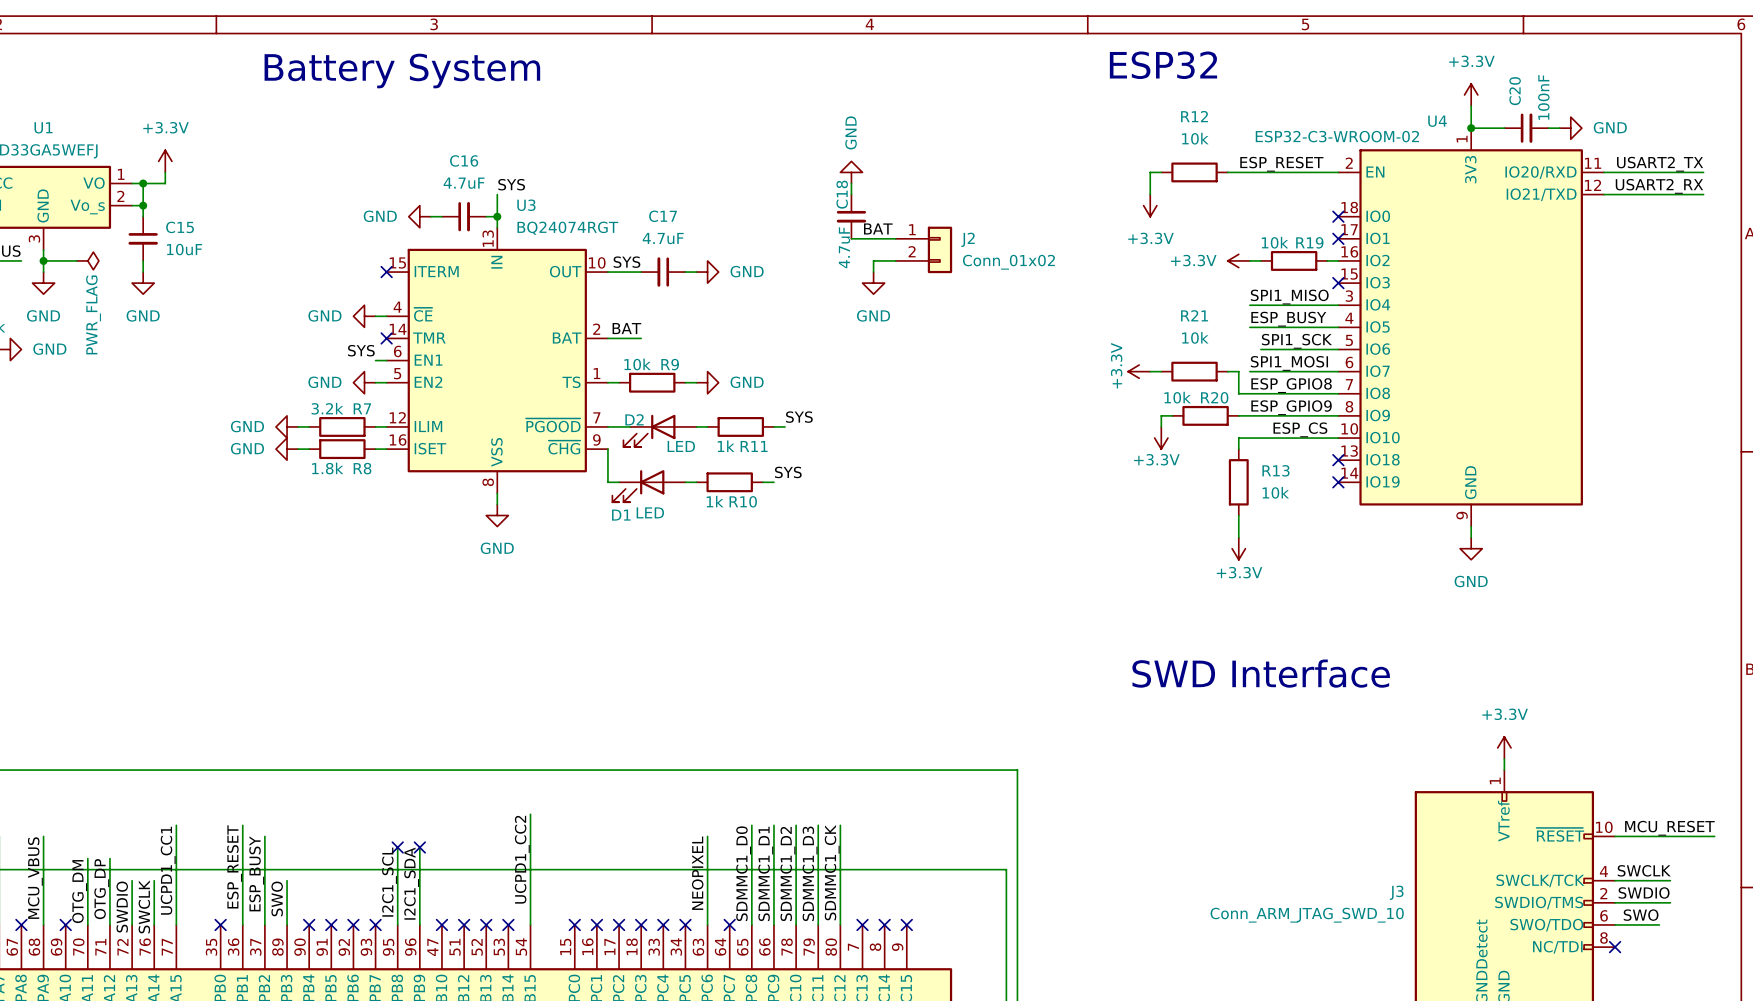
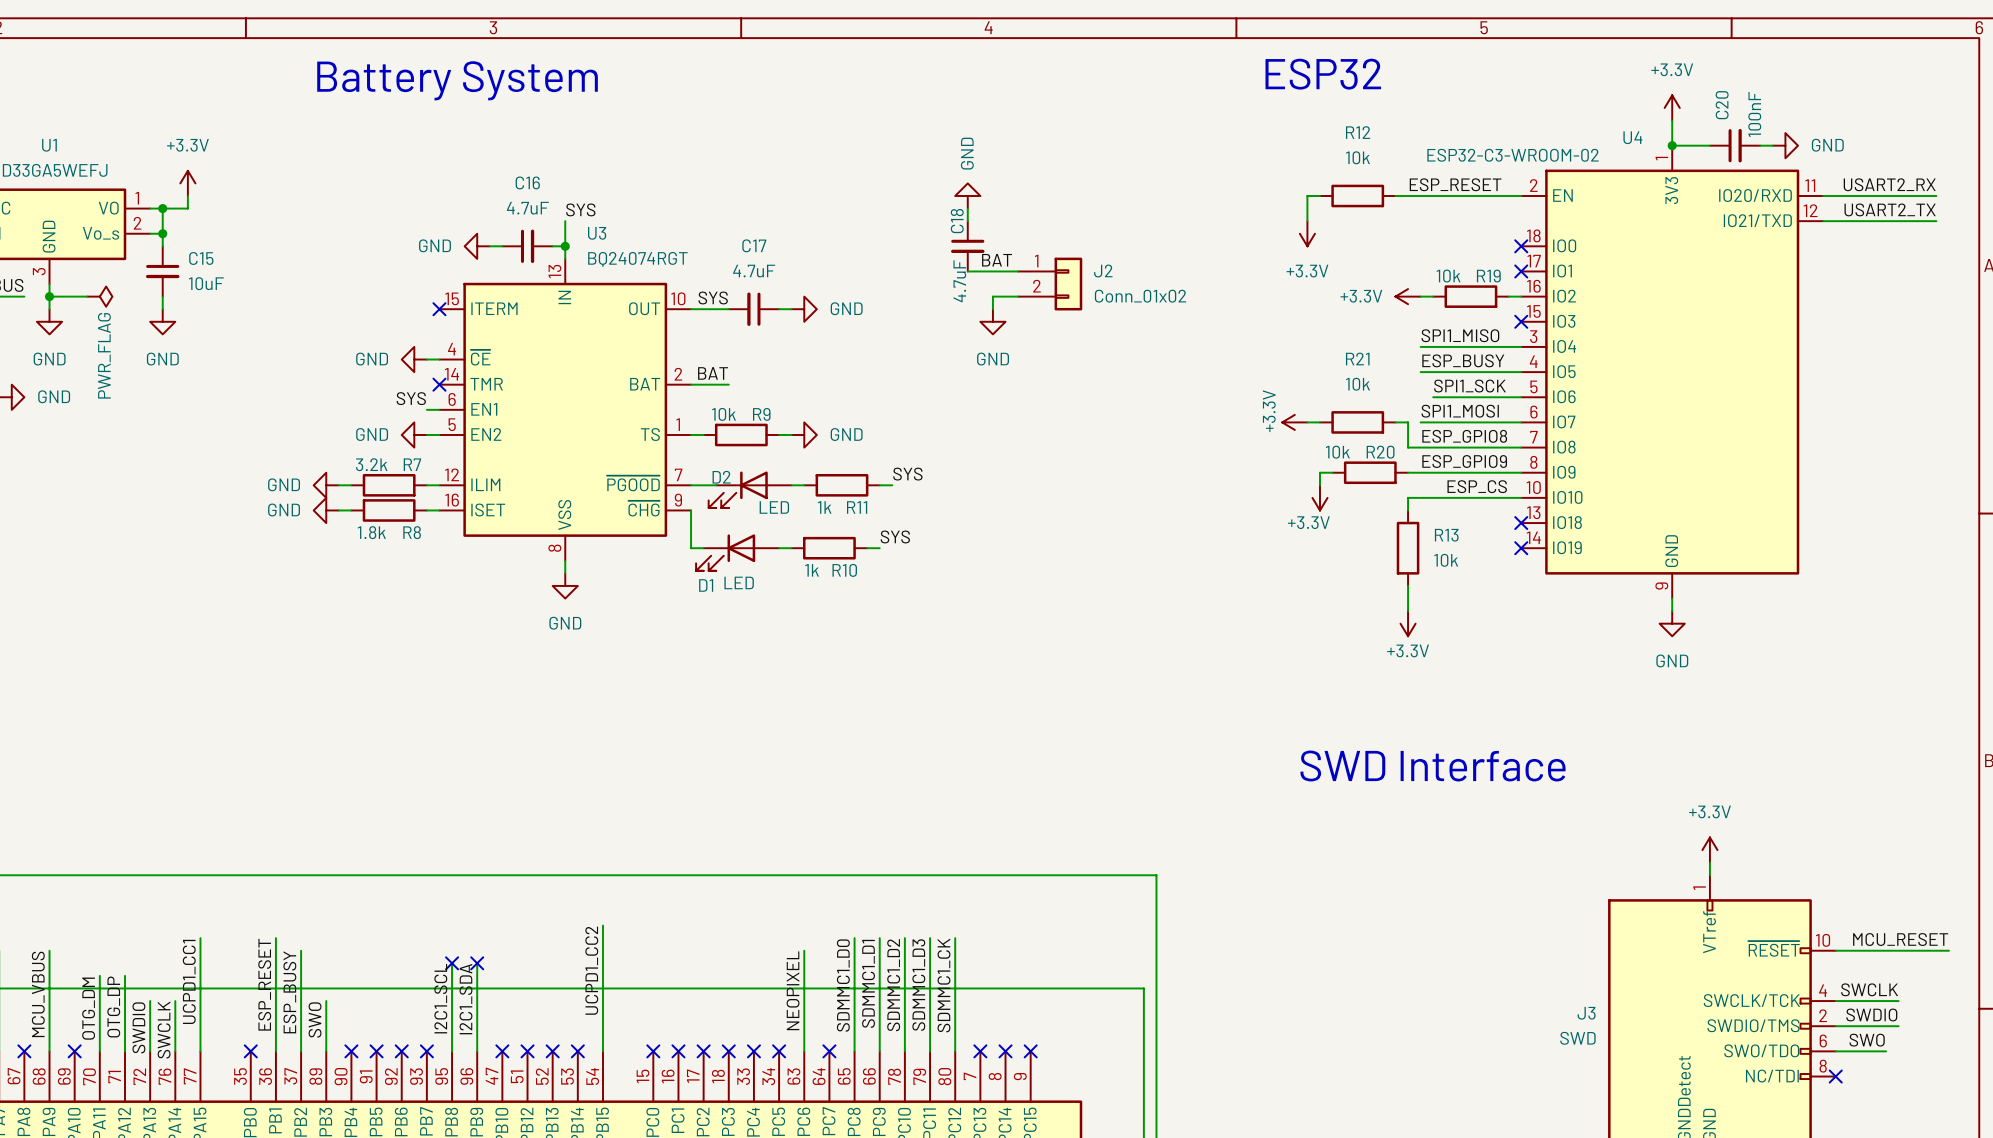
label: USART2_TX (1660, 164) -> USART2_RX (1889, 184)
label: USART2_RX (1659, 186) -> USART2_TX (1890, 209)
J3 value: Conn_ARM_JTAG_SWD_10 (1307, 915) -> SWD (1577, 1038)

